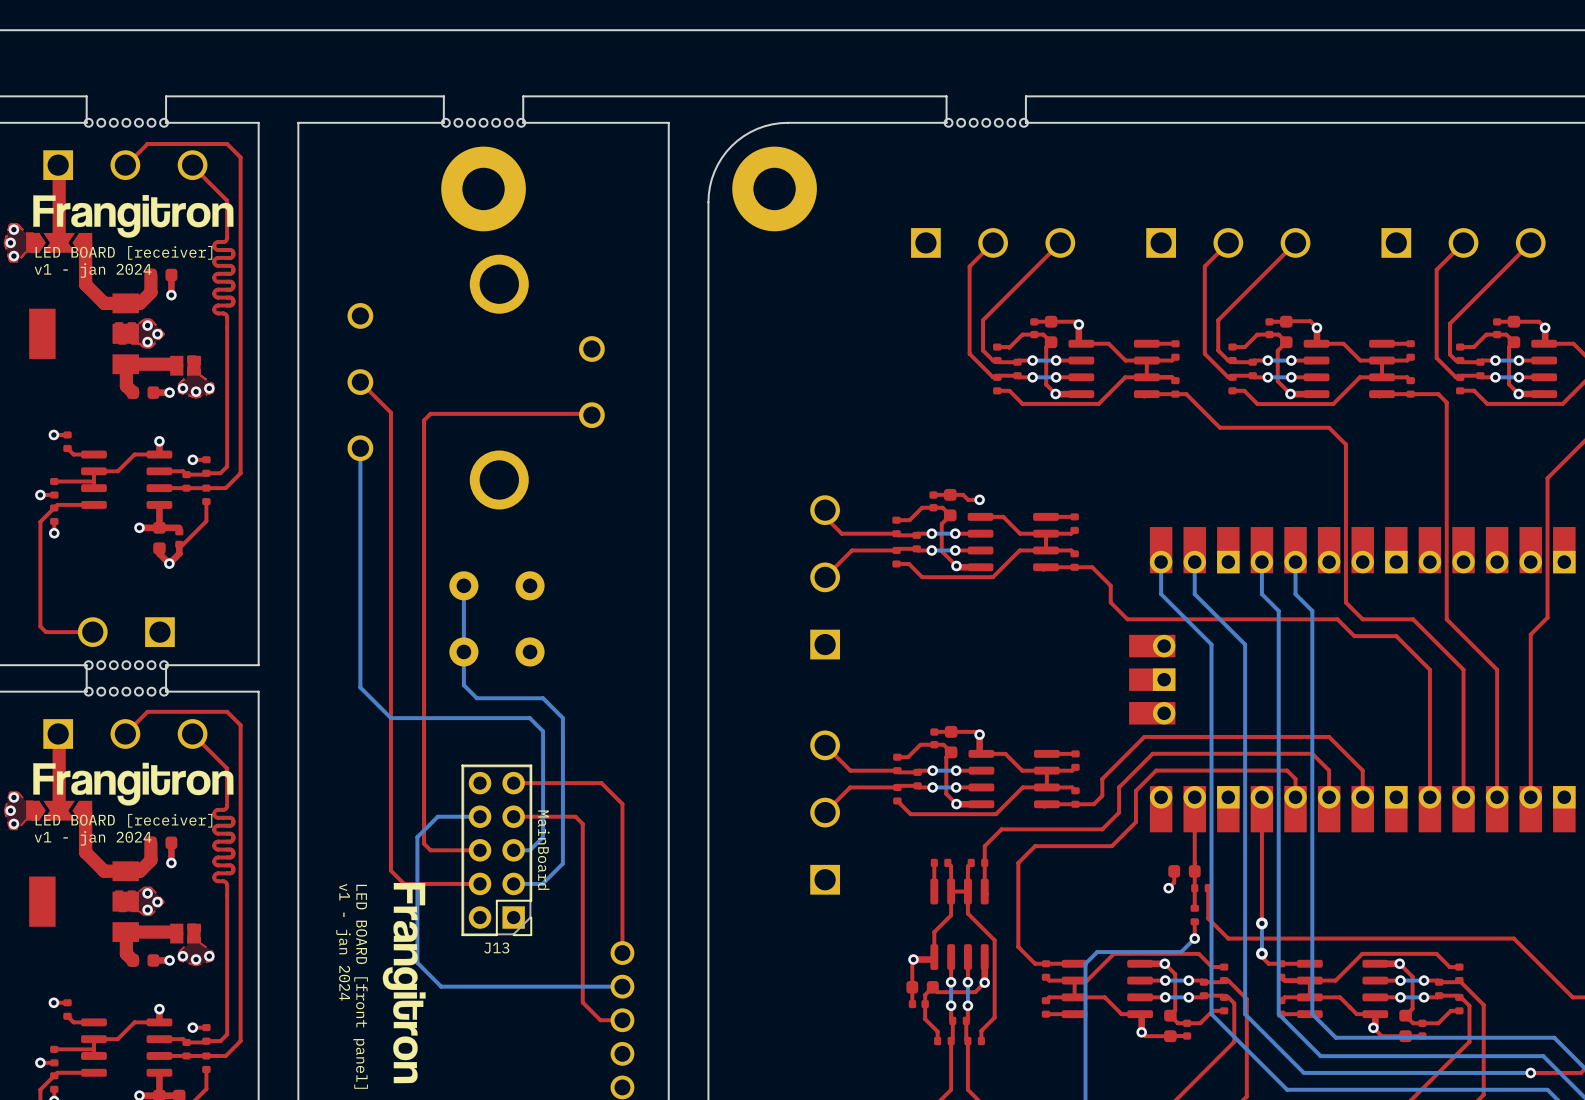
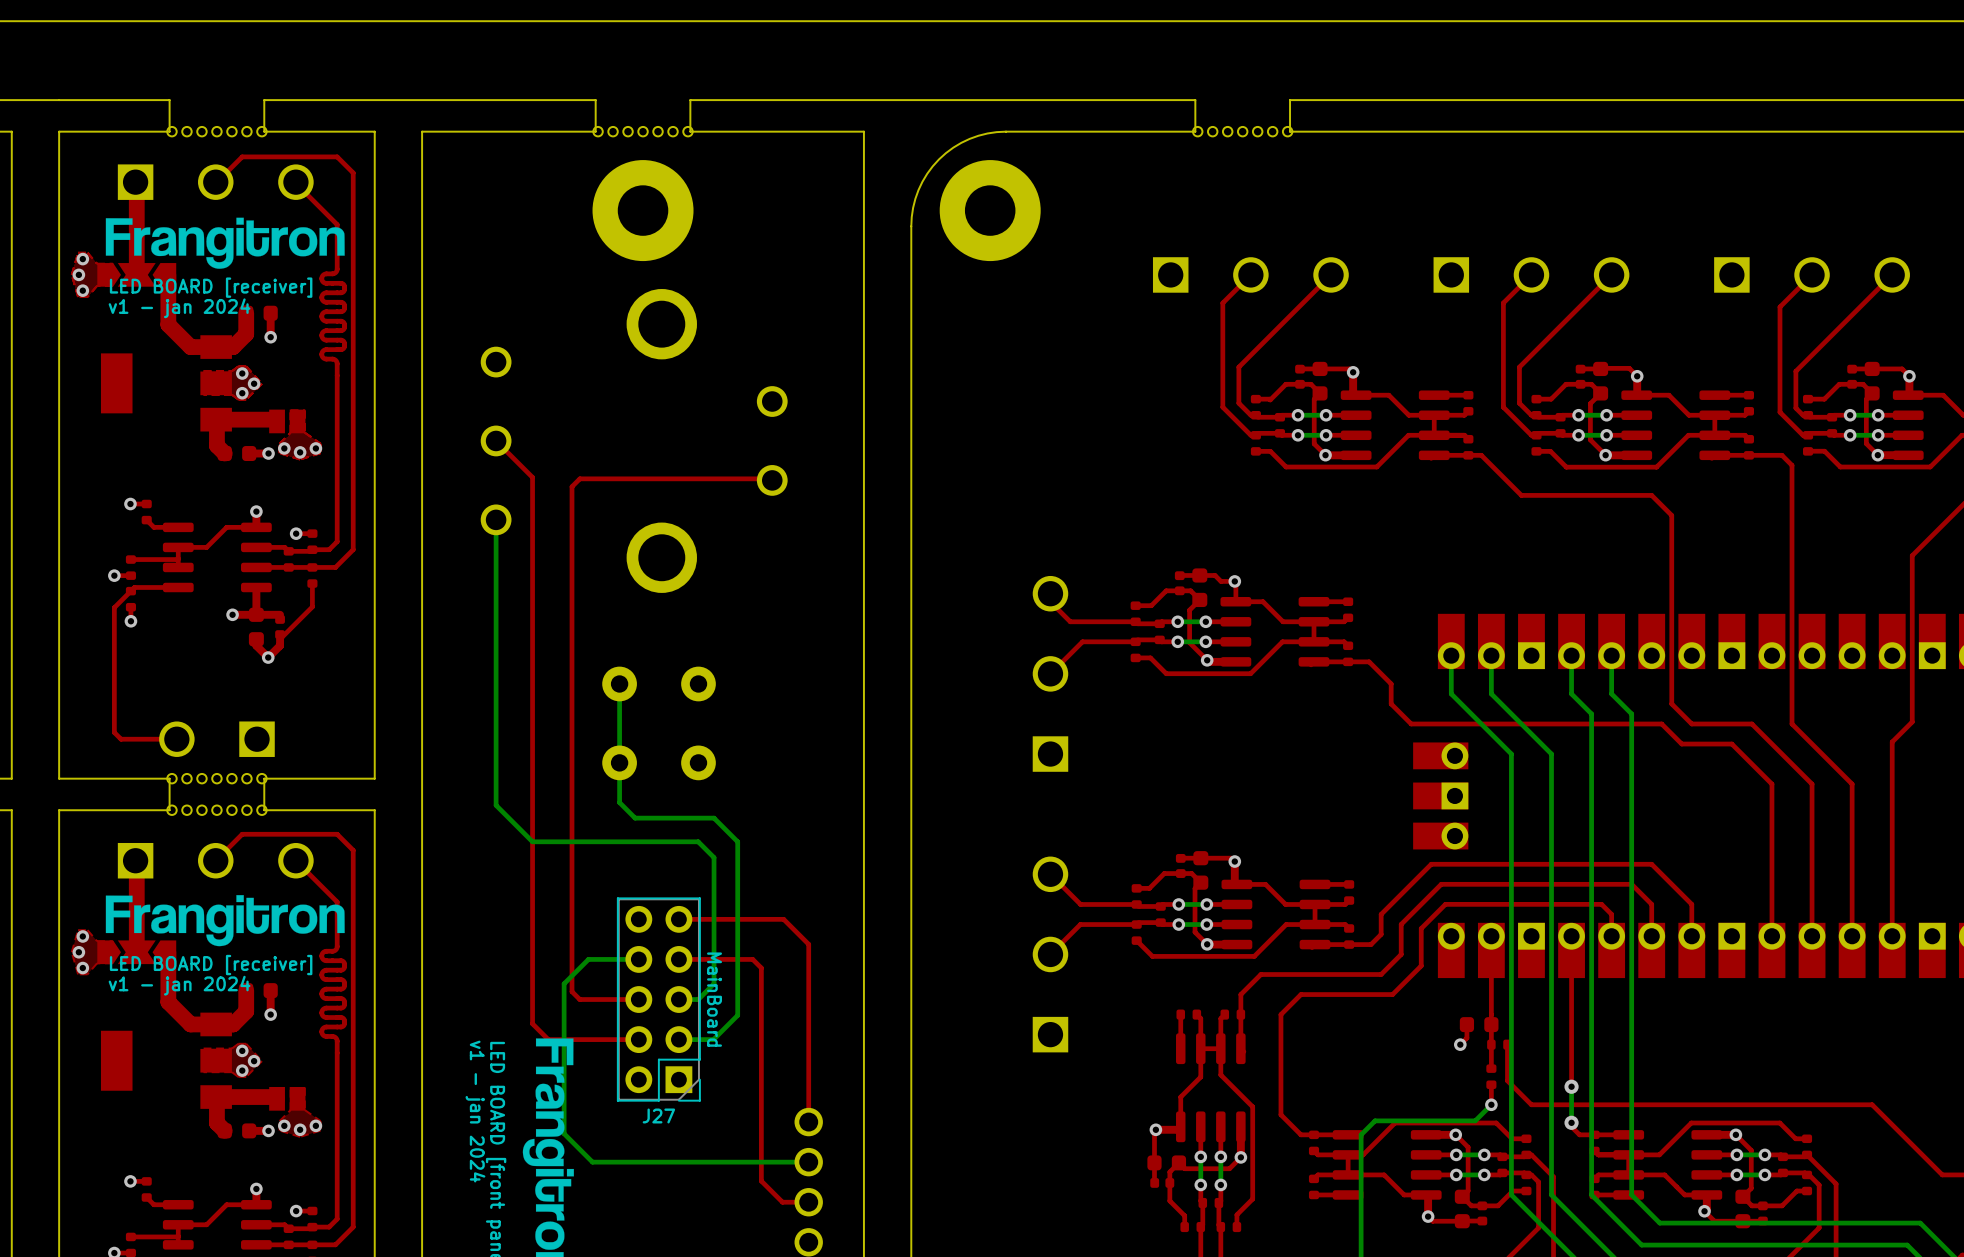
top track: none -> (1234, 581) (1235, 601)
J13 name: J13 (496, 947) -> J27 (658, 1115)

